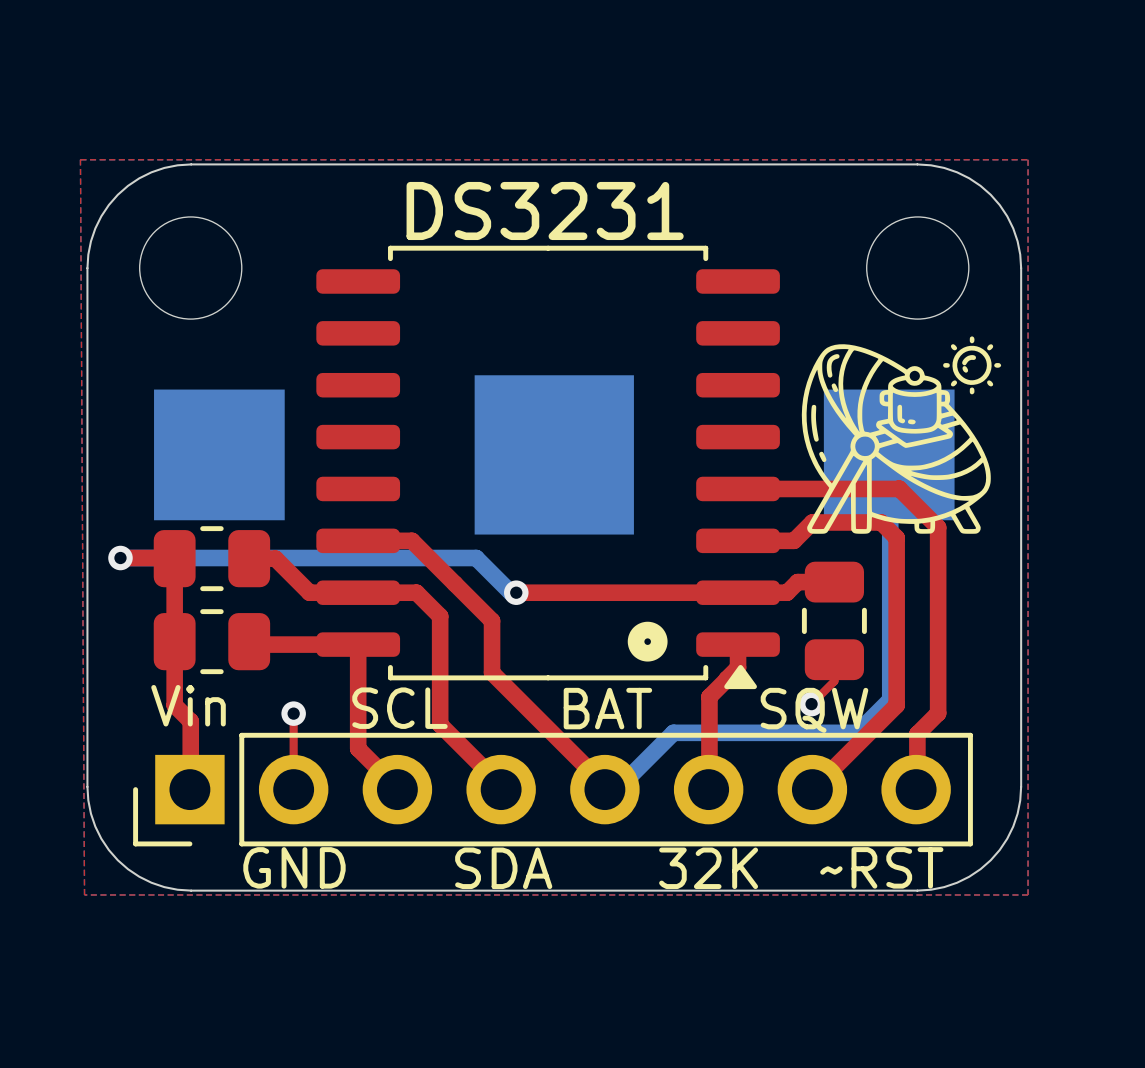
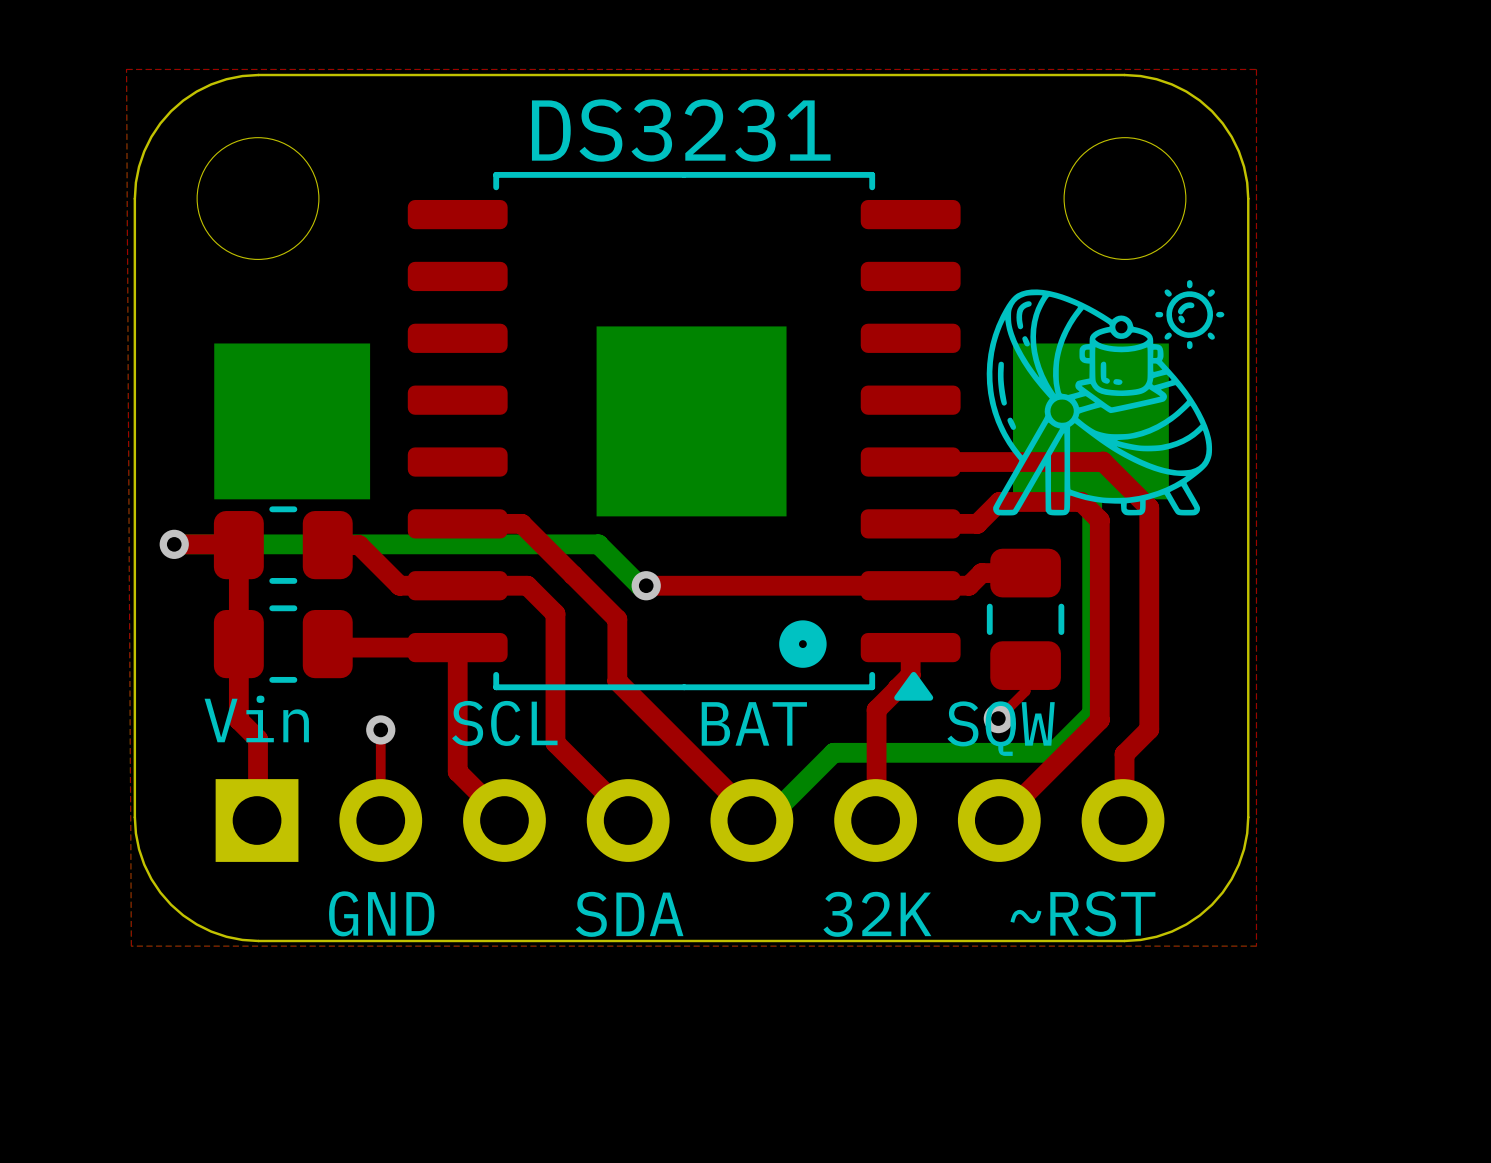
part side: top (553, 789) -> bottom (690, 820)

